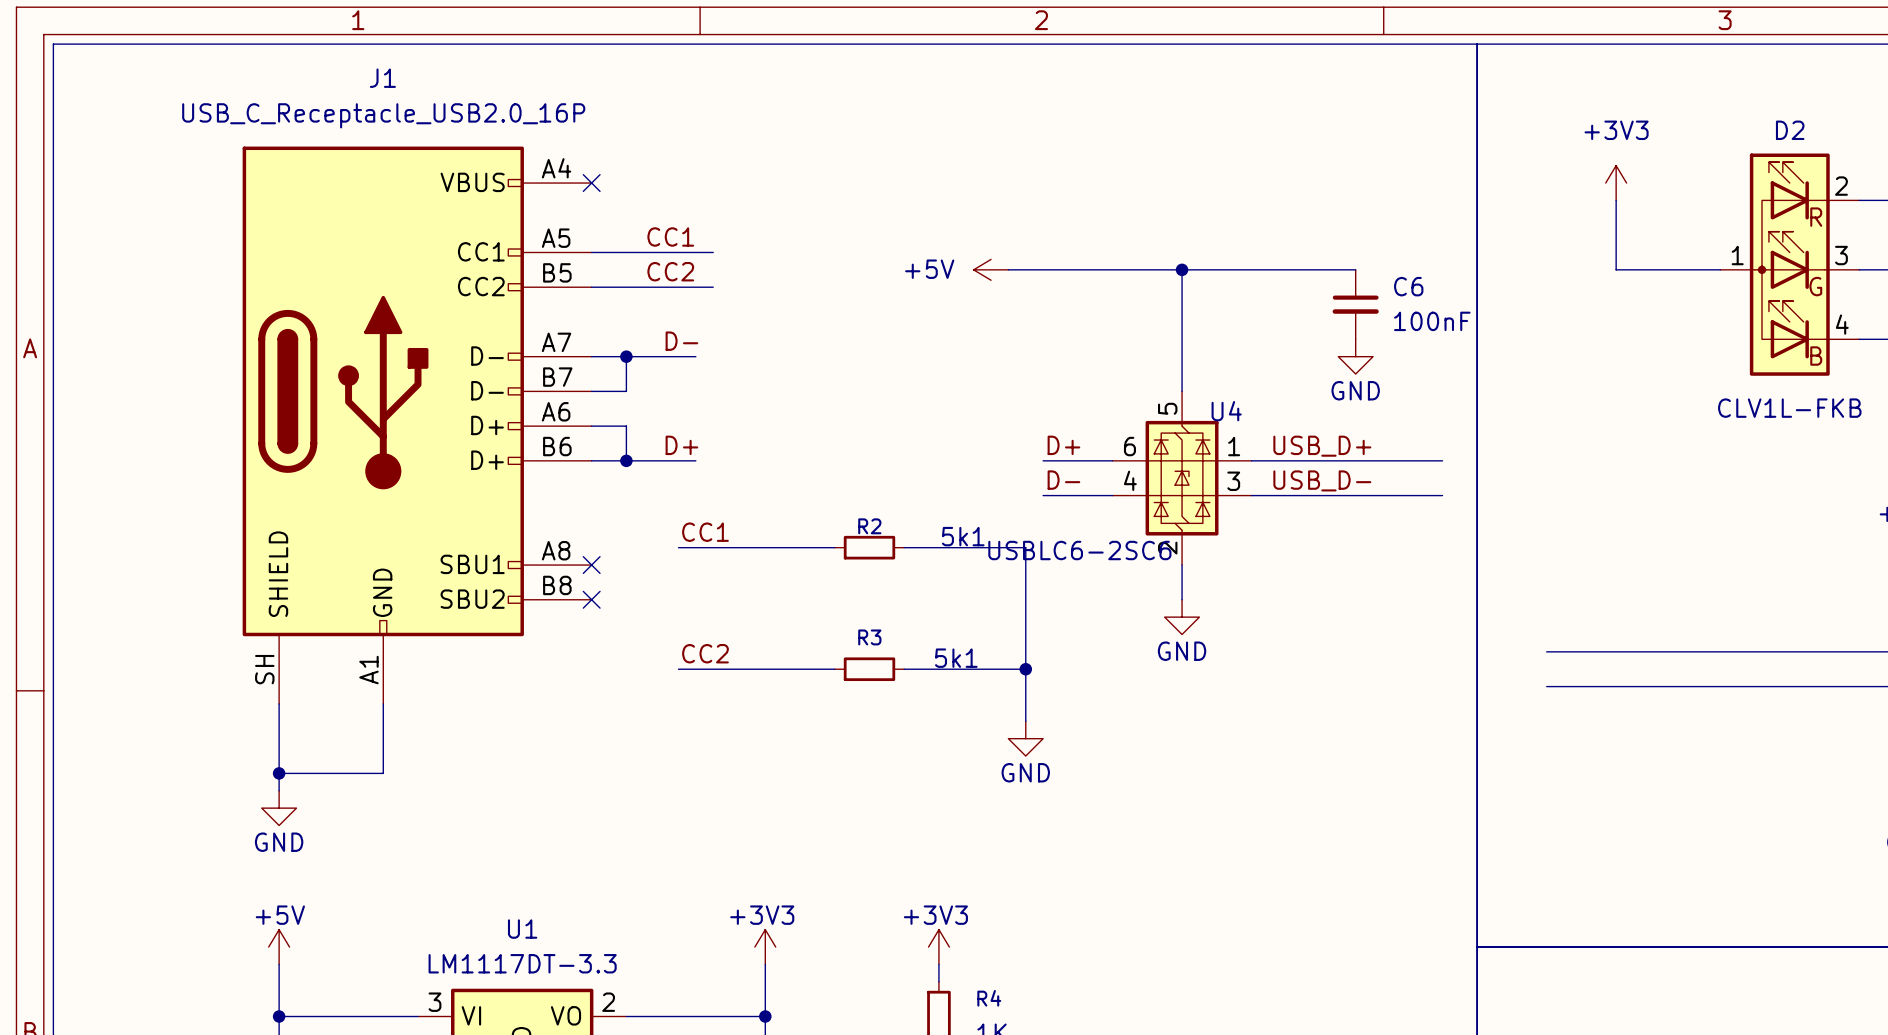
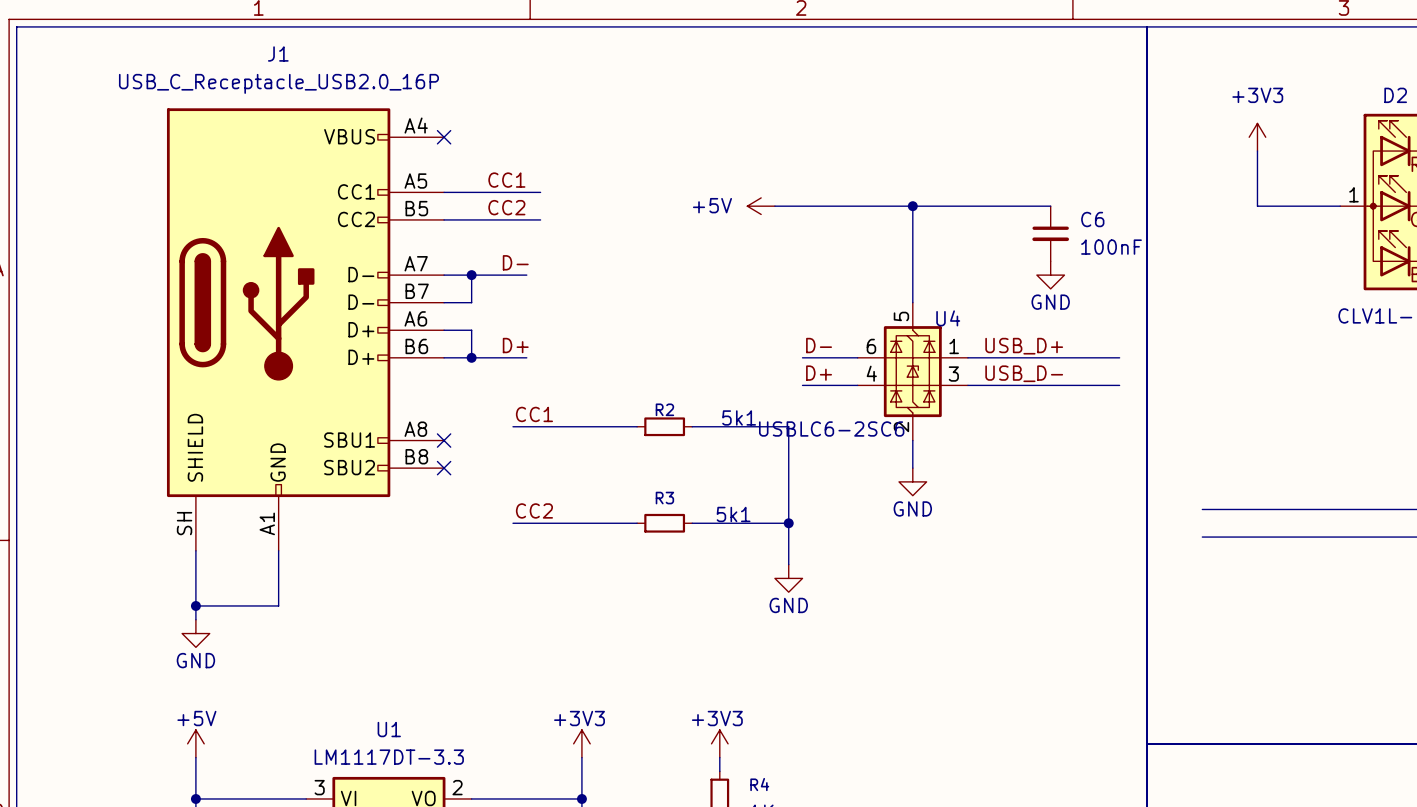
label: D+ (1063, 445) -> D- (819, 345)
label: D- (1063, 480) -> D+ (819, 373)

